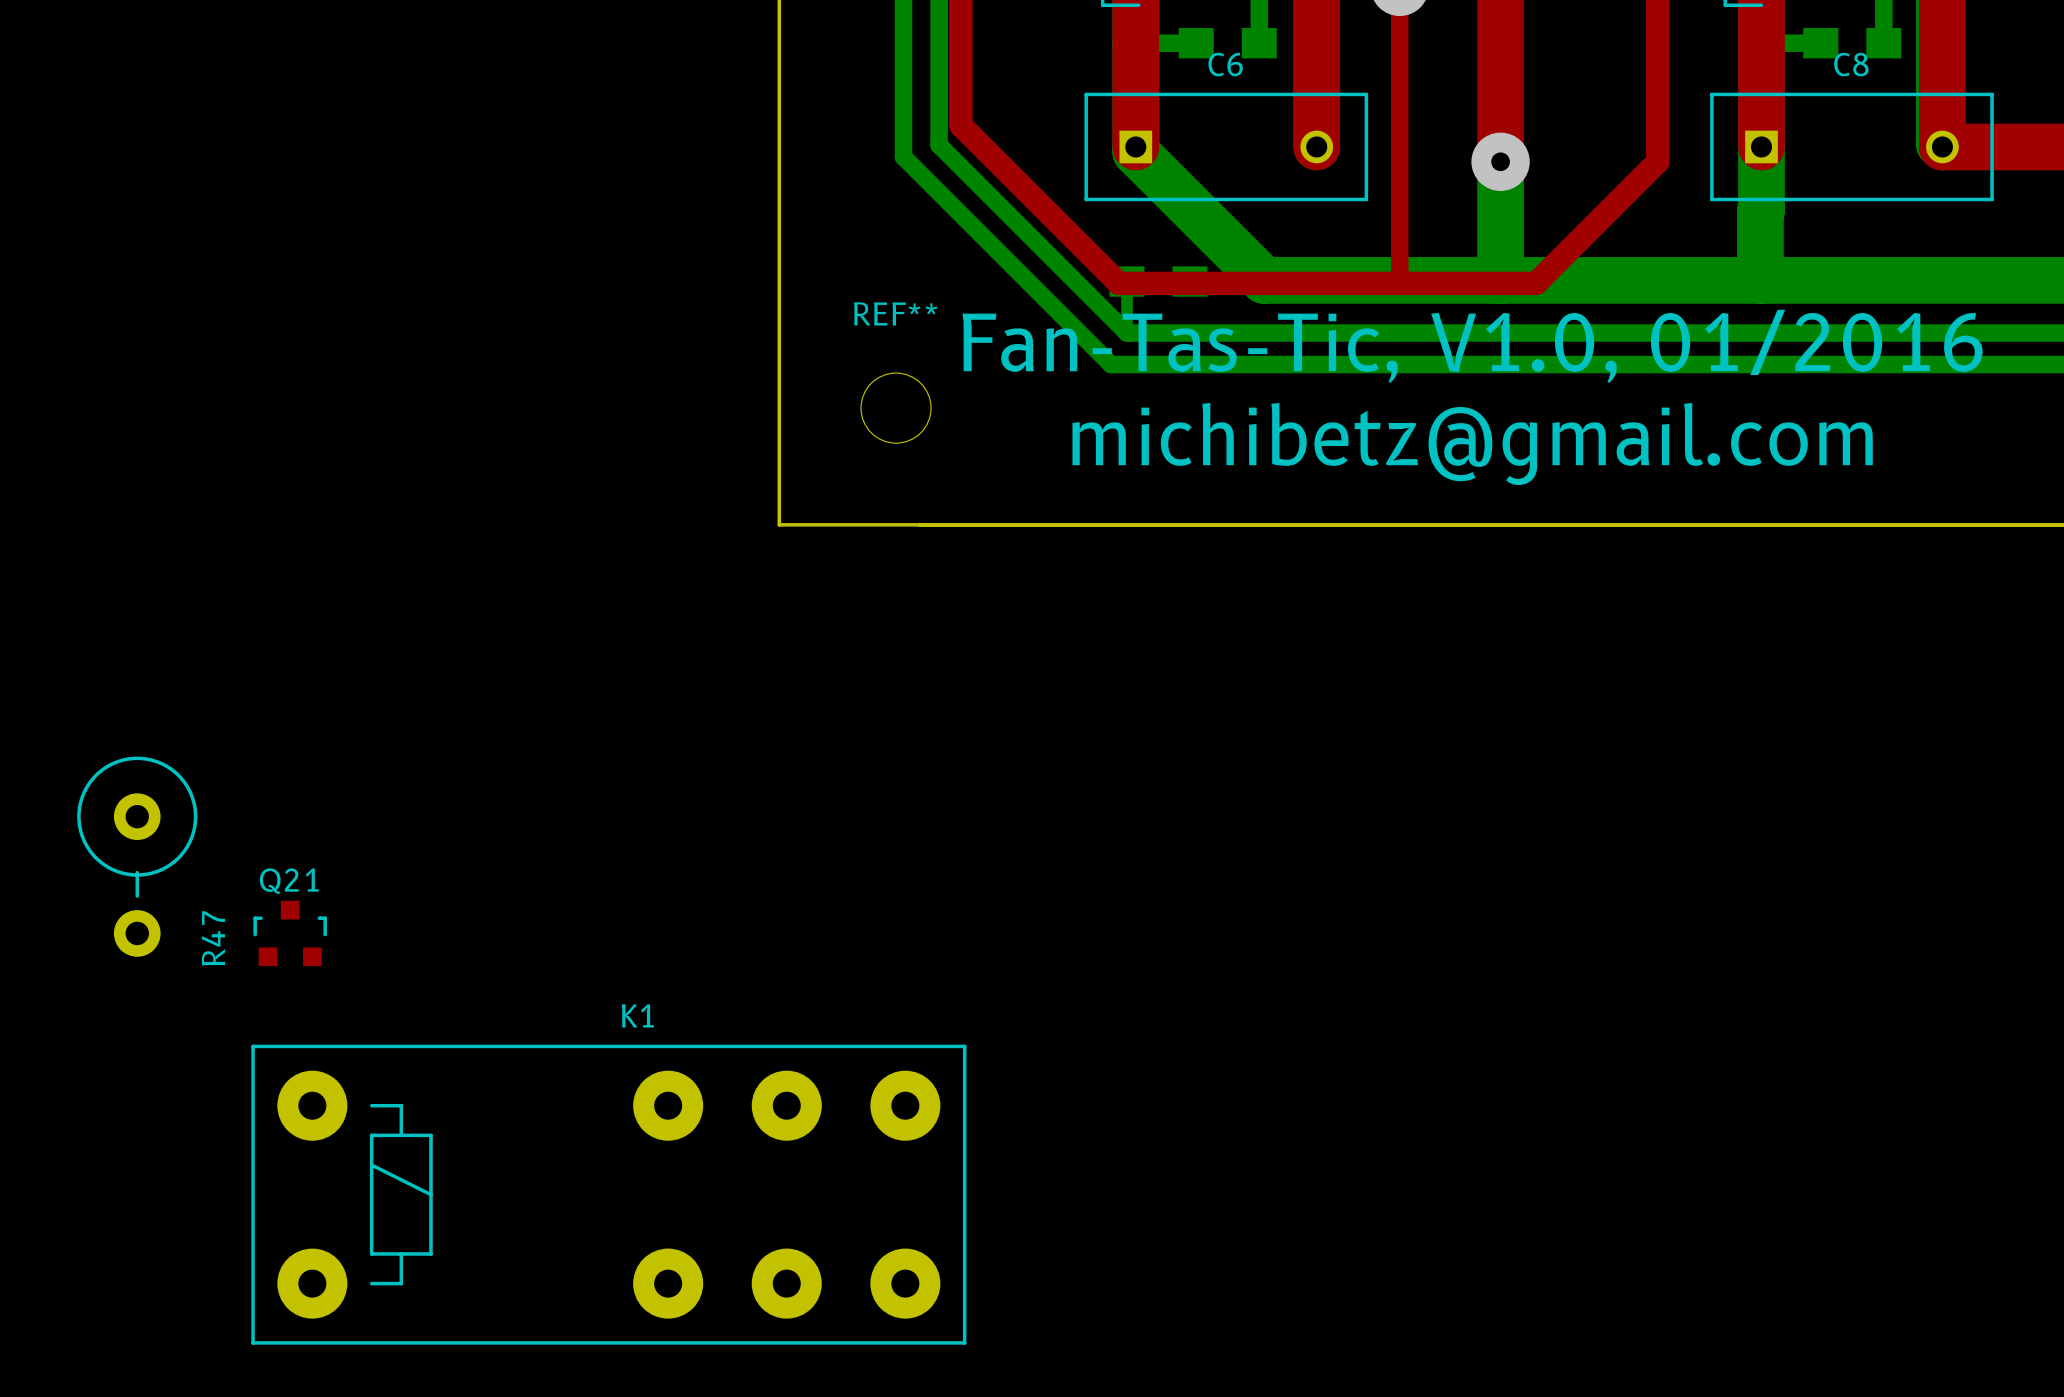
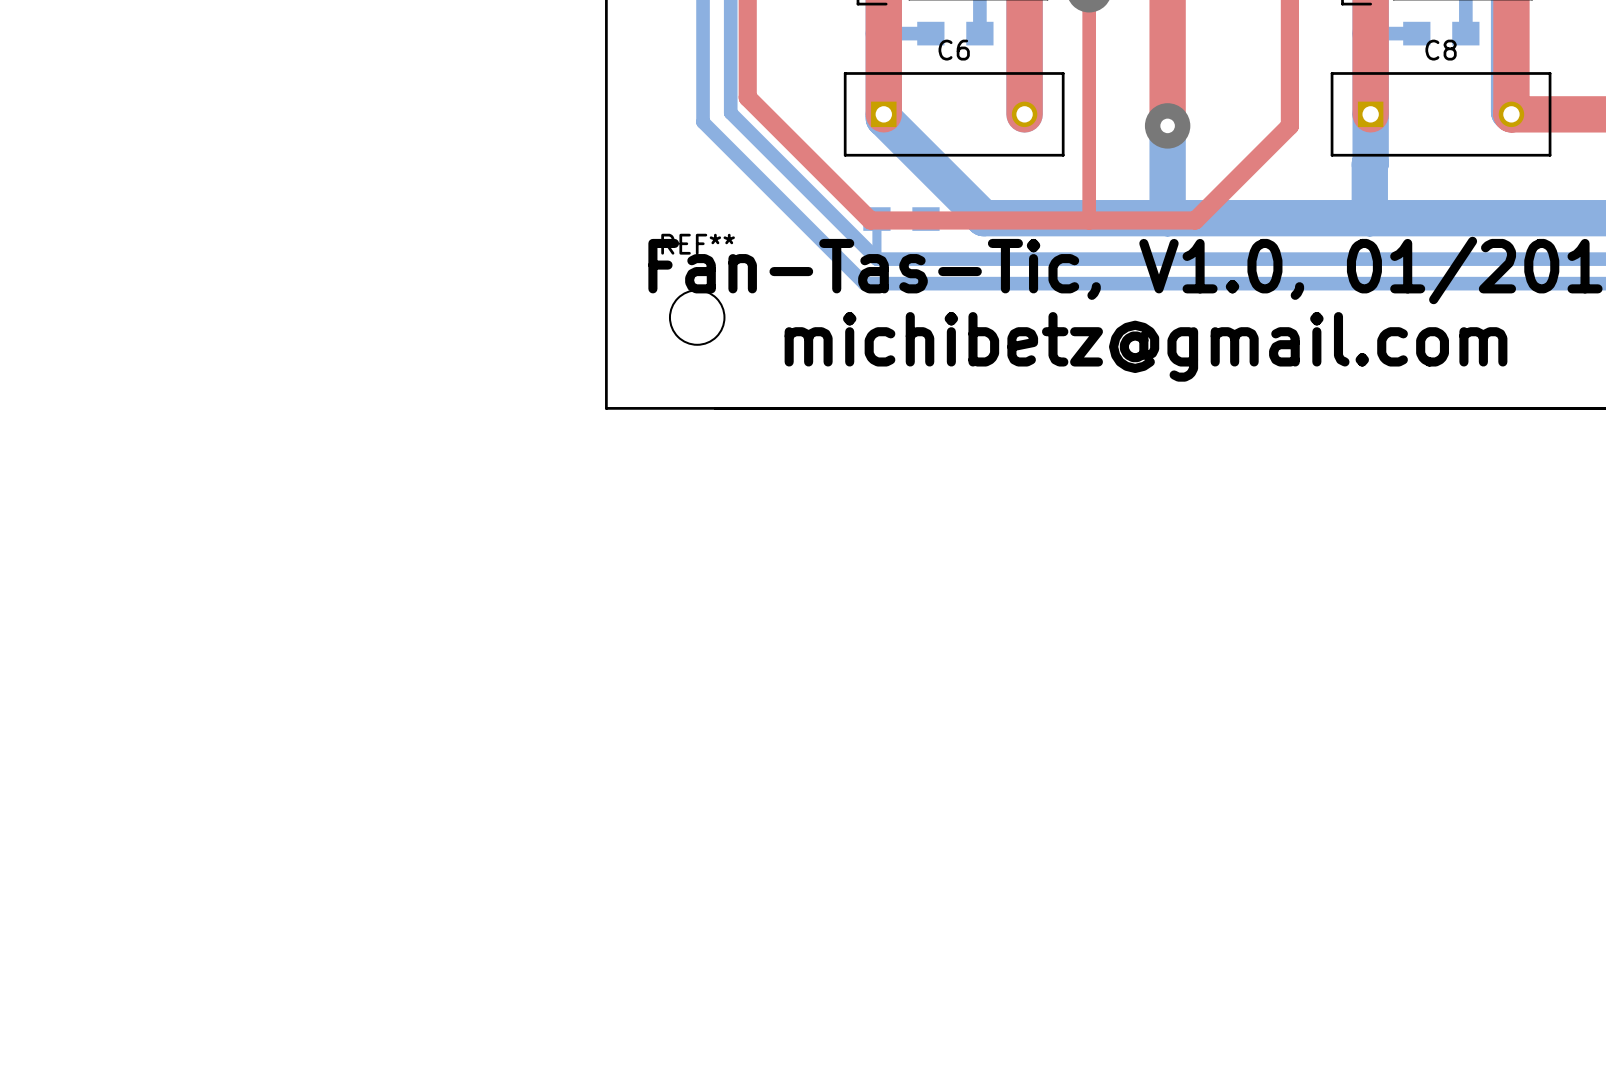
R47: (137, 856) -> none
Q21: (290, 933) -> none
K1: (608, 1194) -> none

